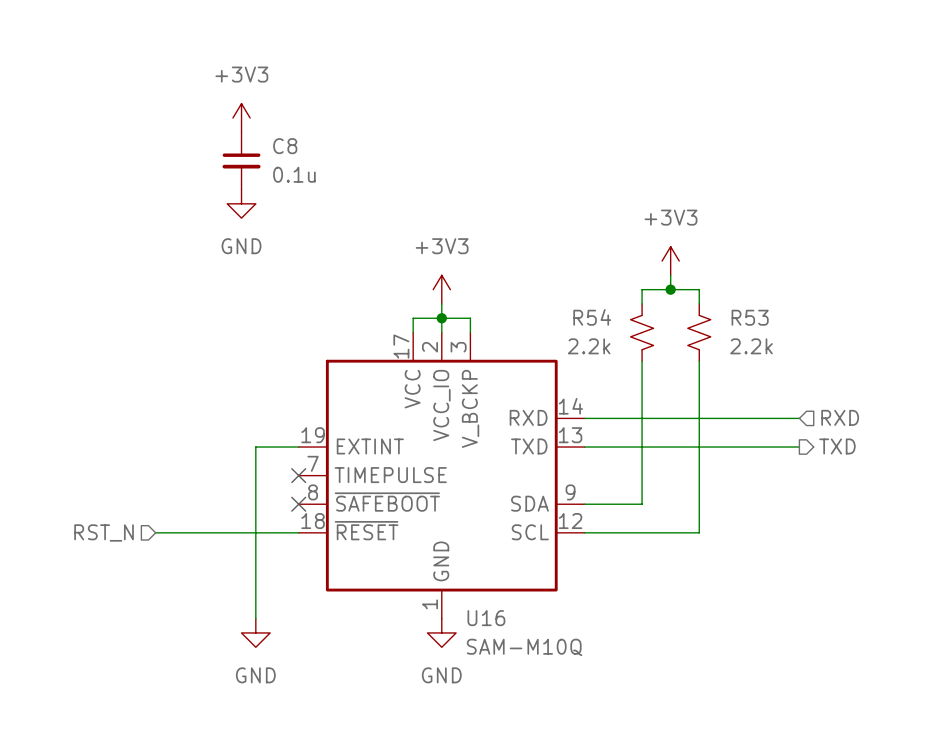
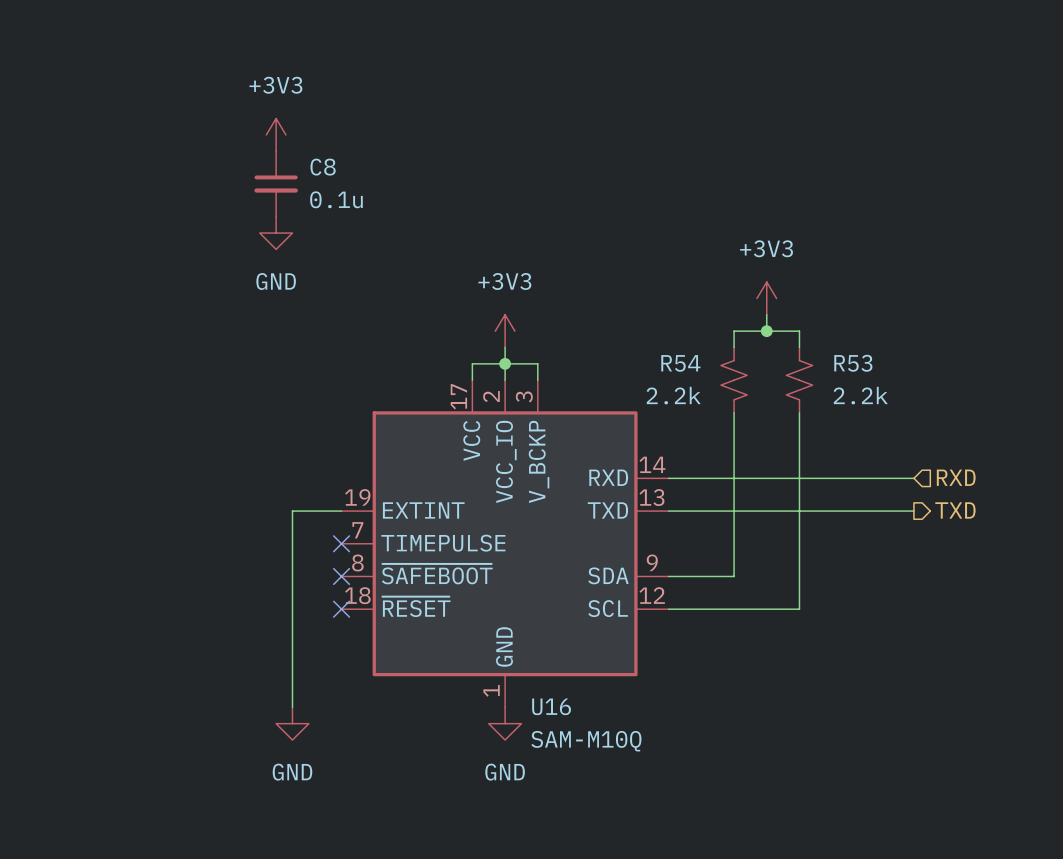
hierarchical label: RST_N (104, 532) -> none
wire: (155, 532) (298, 532) -> none
no-connect mark: none -> (341, 609)

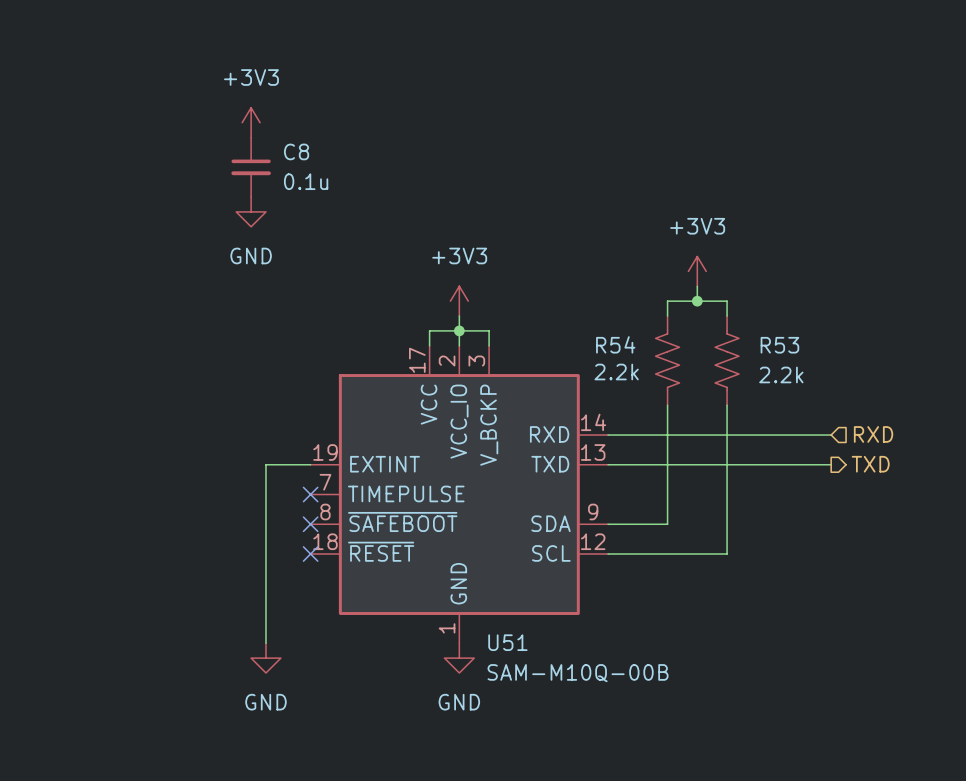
R54 symbol: [720, 347, 748, 413] -> [655, 316, 680, 406]
R53 symbol: [786, 347, 813, 413] -> [715, 316, 739, 406]
U16 name: U16 (551, 706) -> U51 (507, 642)
U16 value: SAM-M10Q (586, 741) -> SAM-M10Q-00B (578, 673)

